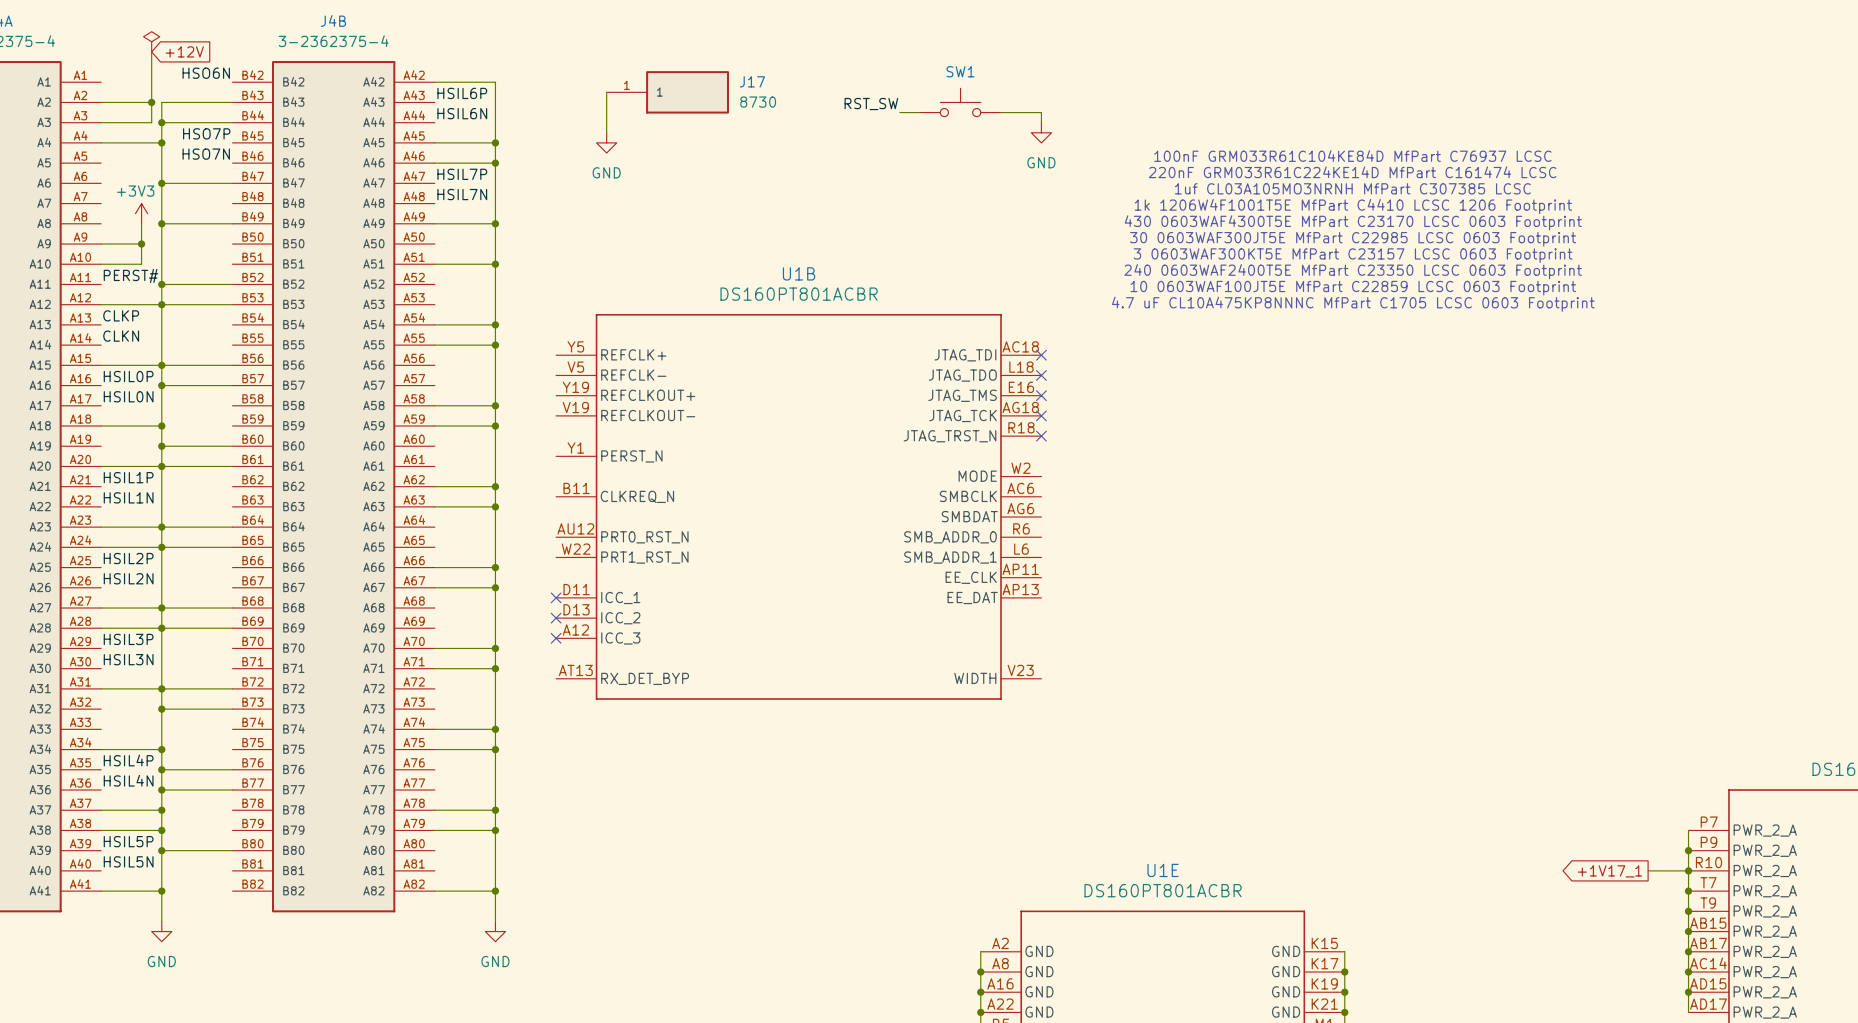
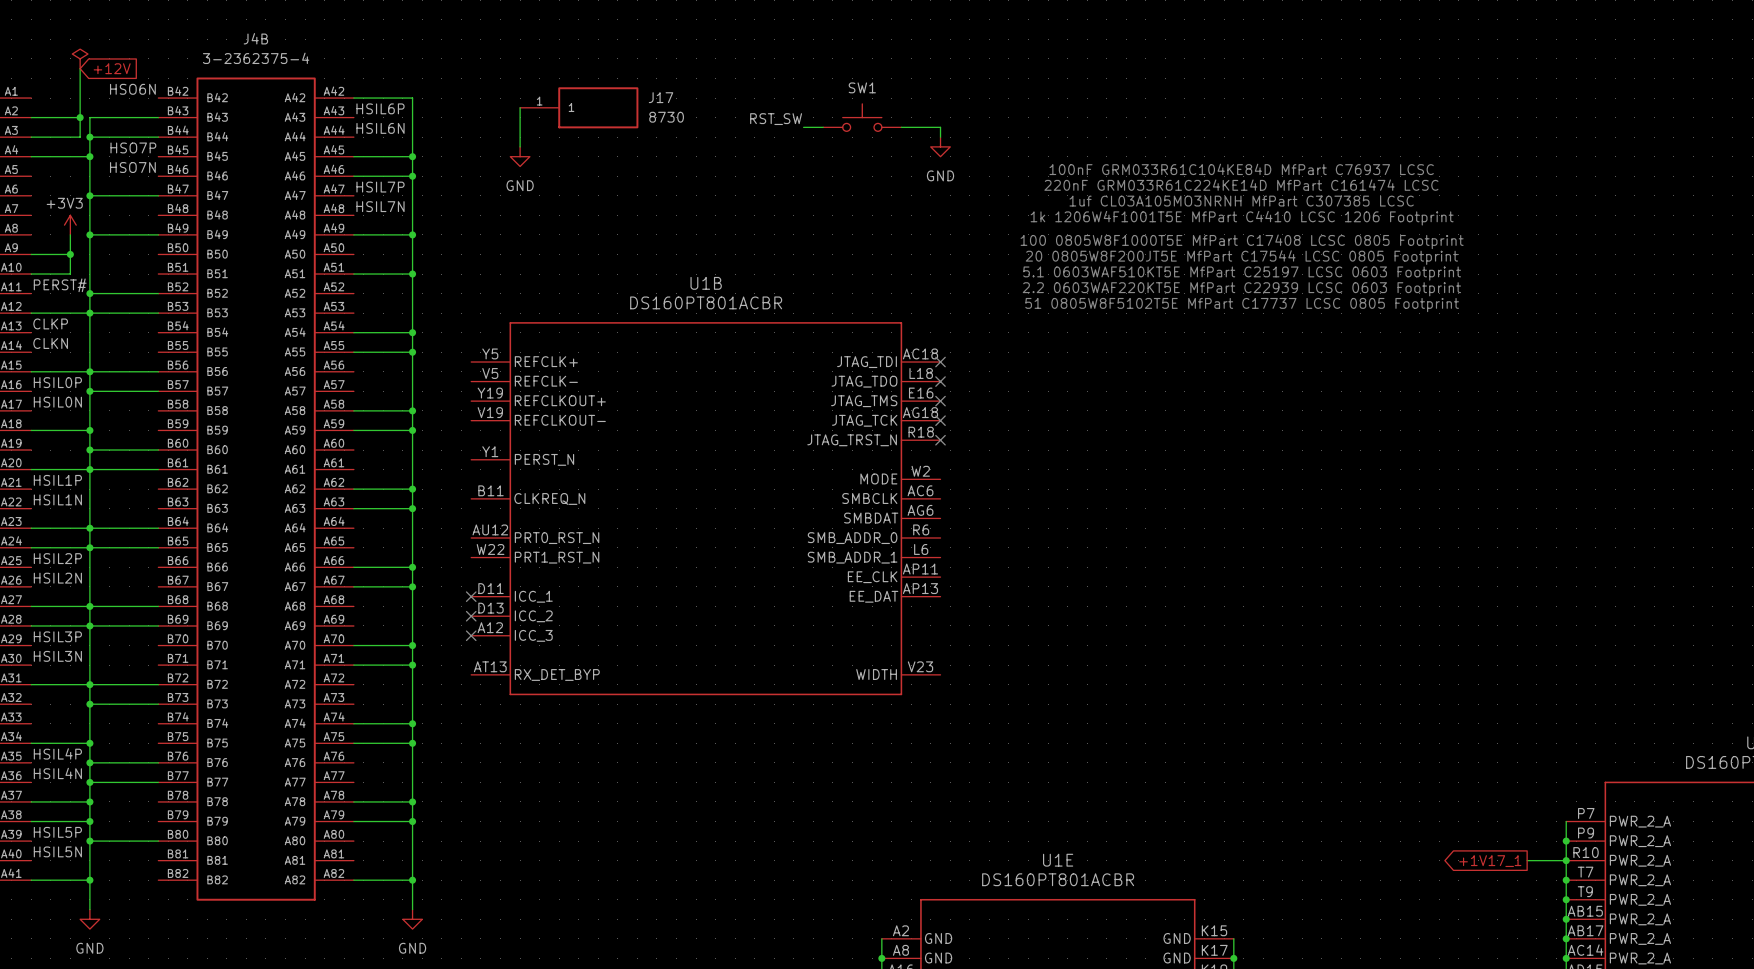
text: 430 0603WAF4300T5E MfPart C23170 LCSC 0603 Footprint (1353, 222) -> none
text: none -> 100 0805W8F1000T5E MfPart C17408 LCSC 0805 Footprint (1242, 241)
text: 30 0603WAF300JT5E MfPart C22985 LCSC 0603 Footprint (1353, 239) -> none
text: none -> 20 0805W8F200JT5E MfPart C17544 LCSC 0805 Footprint (1241, 257)
text: 3 0603WAF300KT5E MfPart C23157 LCSC 0603 Footprint (1353, 255) -> none
text: none -> 5.1 0603WAF510KT5E MfPart C25197 LCSC 0603 Footprint (1242, 273)
text: 240 0603WAF2400T5E MfPart C23350 LCSC 0603 Footprint (1353, 271) -> none
text: none -> 2.2 0603WAF220KT5E MfPart C22939 LCSC 0603 Footprint (1241, 289)
text: 10 0603WAF100JT5E MfPart C22859 LCSC 0603 Footprint (1353, 288) -> none
text: none -> 51 0805W8F5102T5E MfPart C17737 LCSC 0805 Footprint (1242, 305)
text: 4.7 uF CL10A475KP8NNNC MfPart C1705 LCSC 0603 Footprint (1353, 304) -> none

